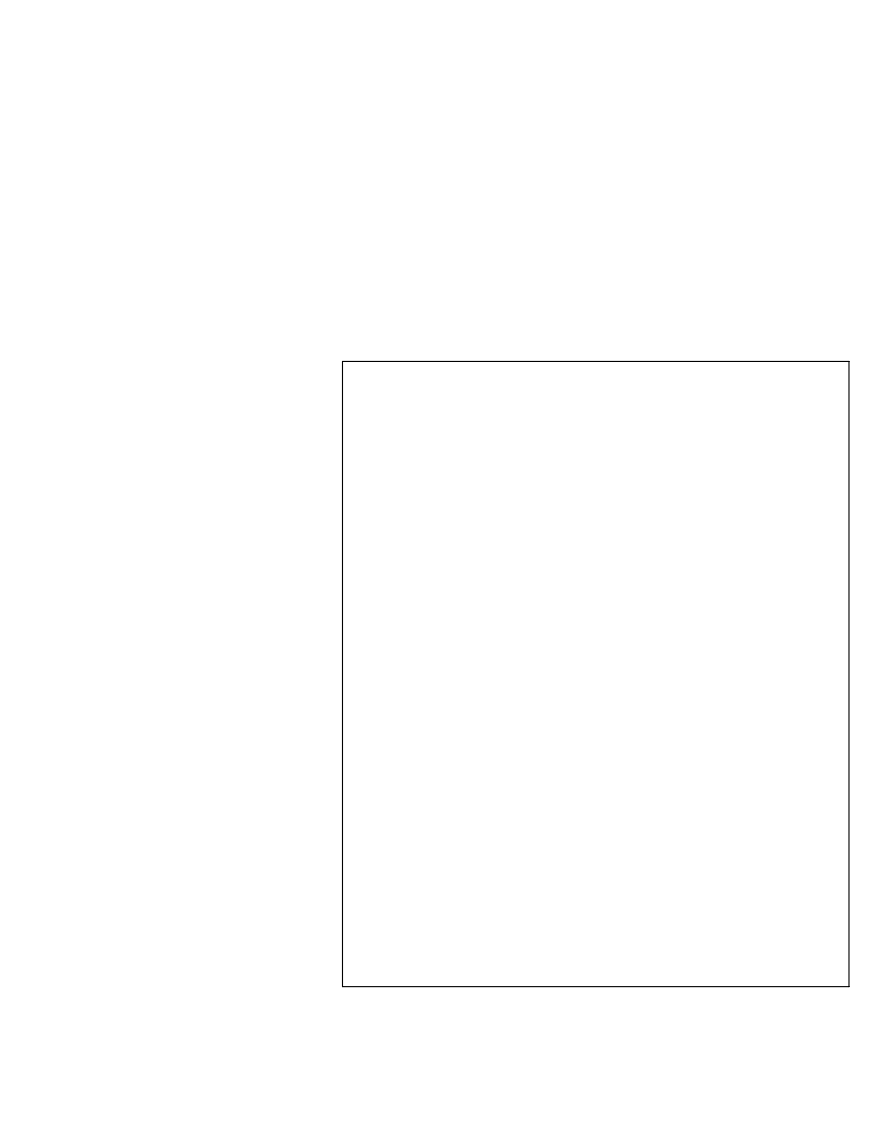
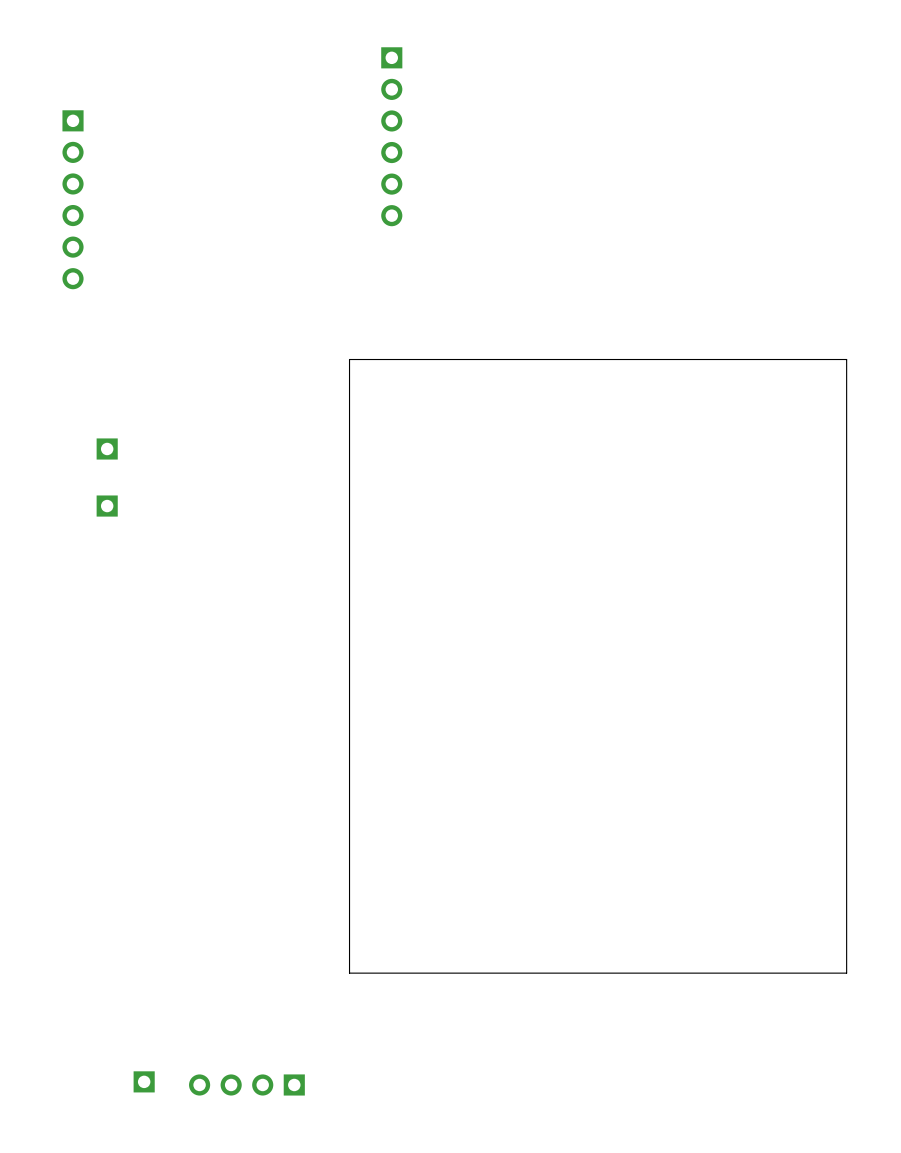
part: none -> (391, 136)
part: none -> (73, 199)
part: none -> (107, 448)
part: none -> (107, 506)
part: none -> (144, 1081)
part: none -> (246, 1084)

